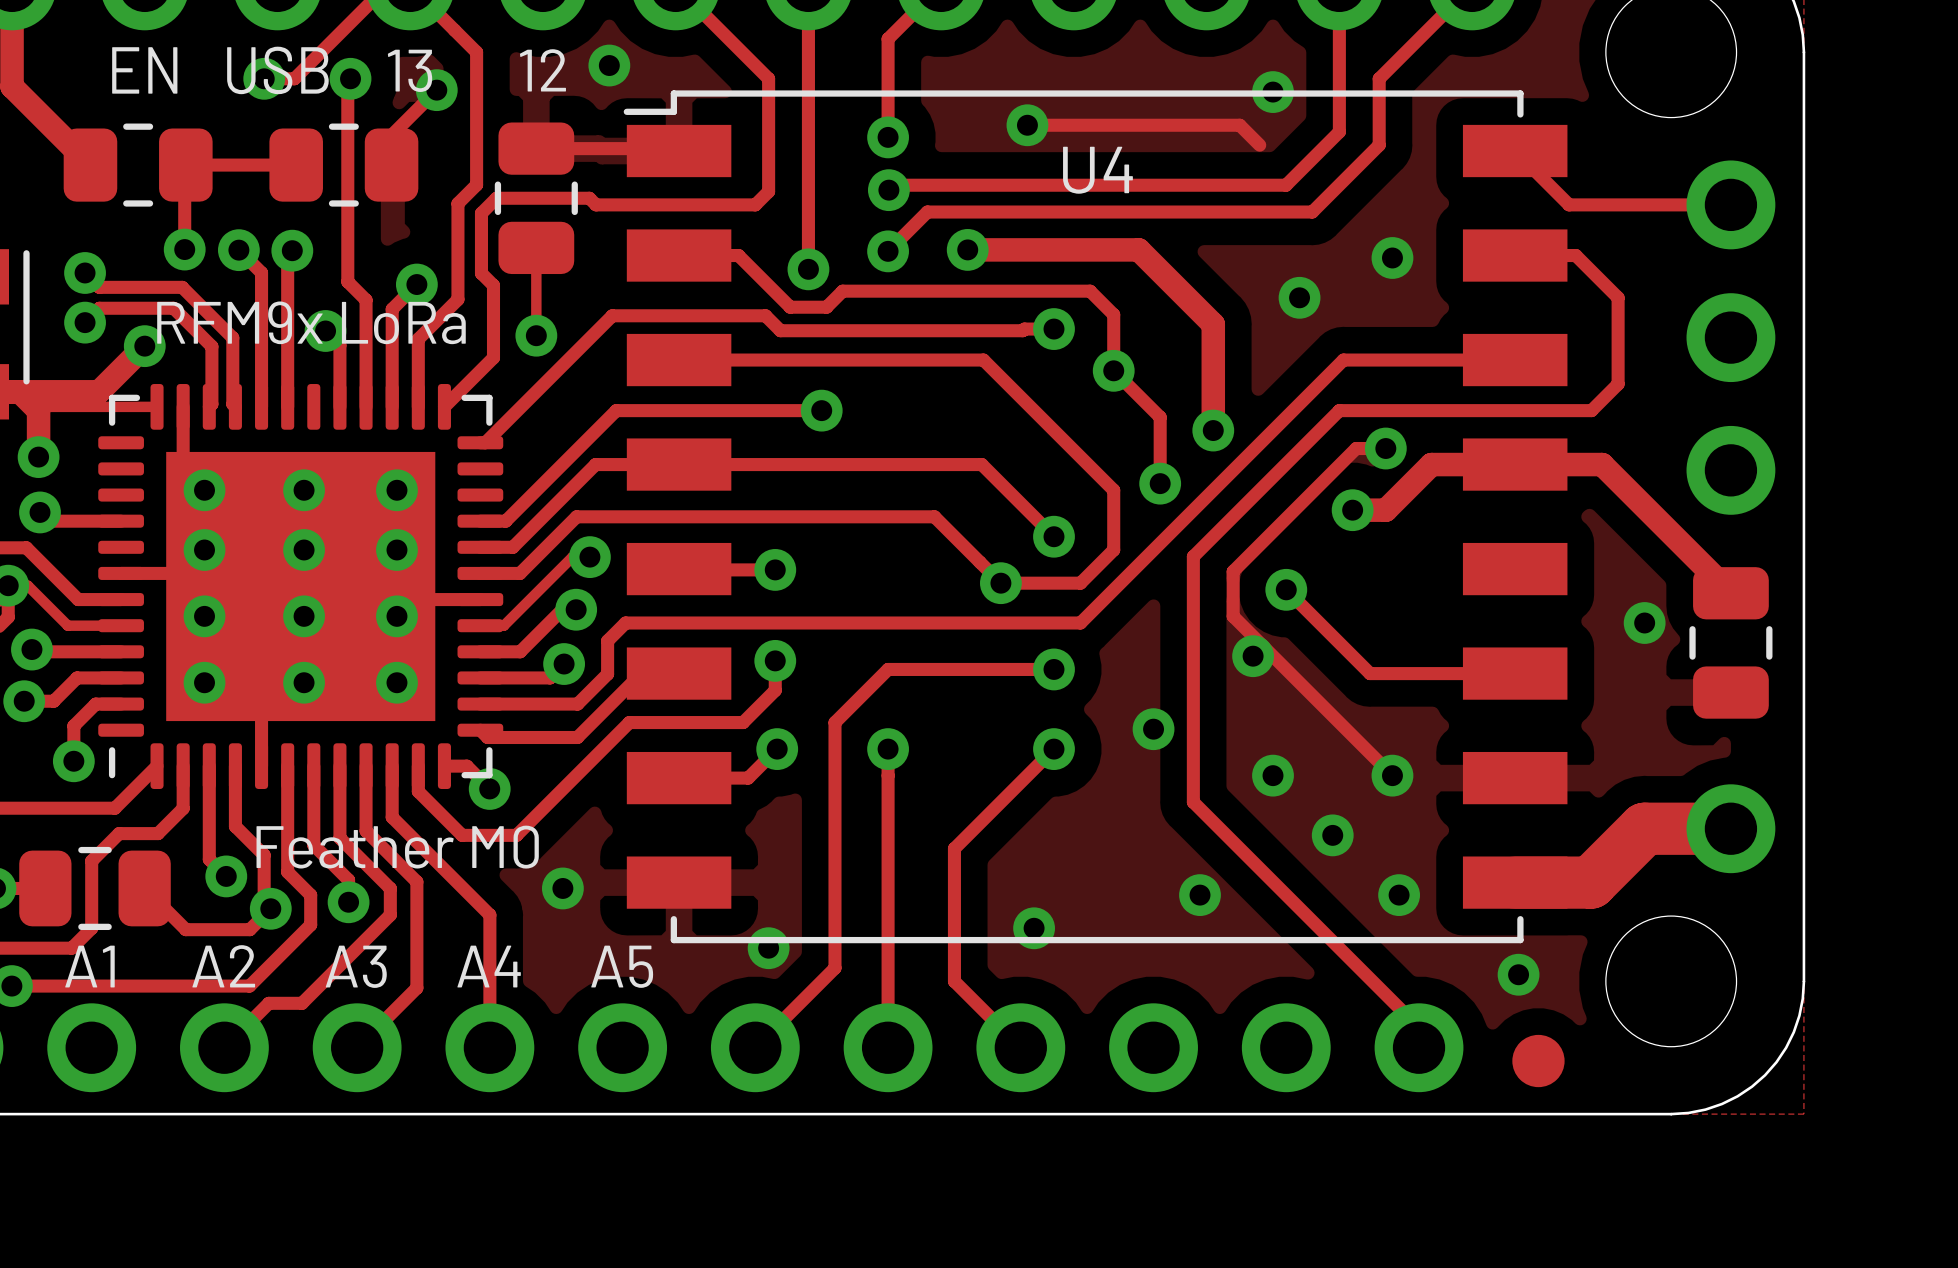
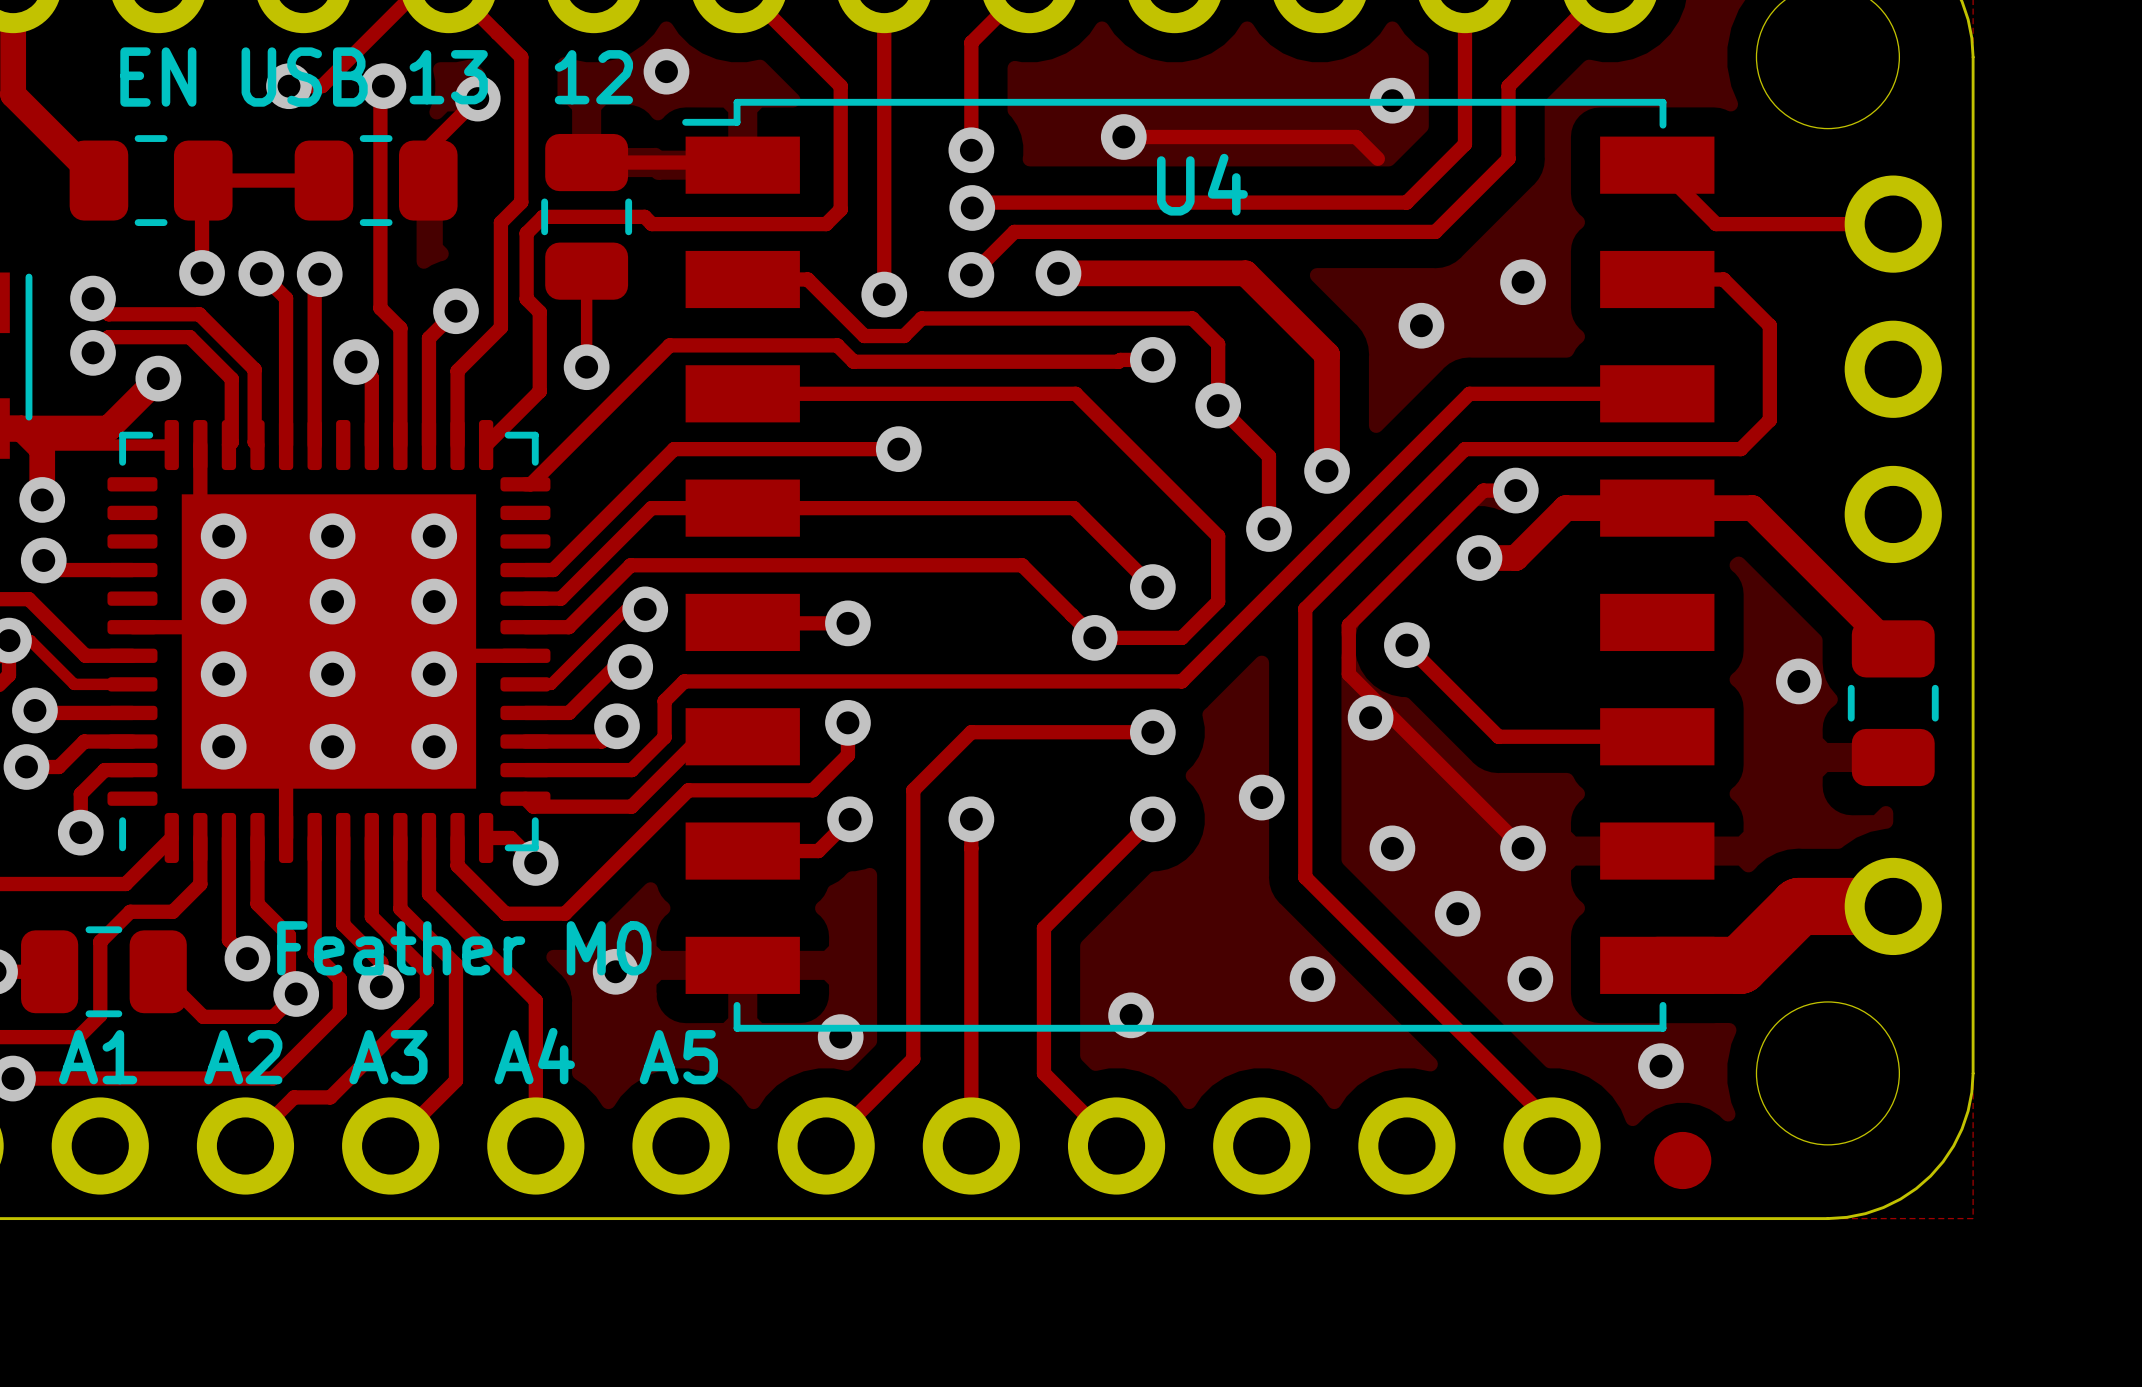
text: RFM9x LoRa (311, 322) -> none
text position: Feather M0 (397, 847) -> Feather M0 (464, 948)

